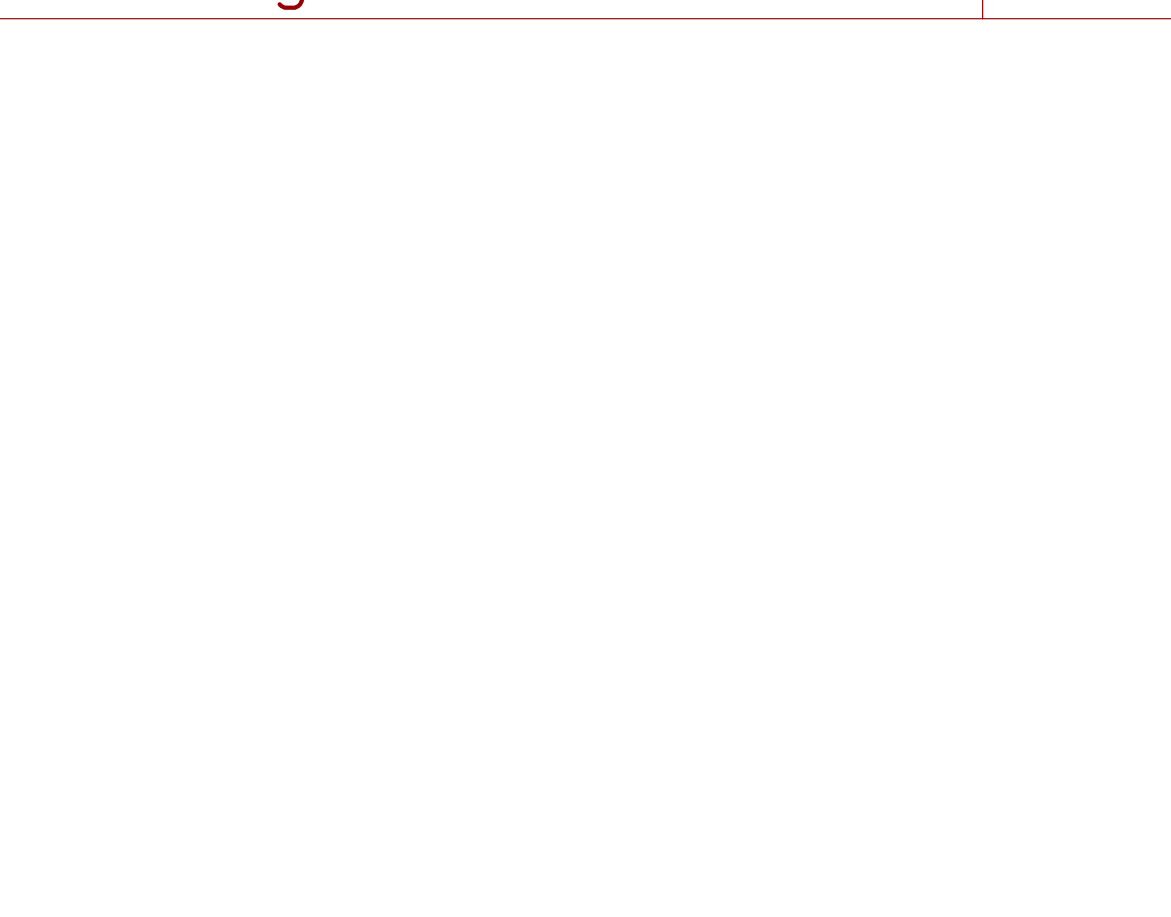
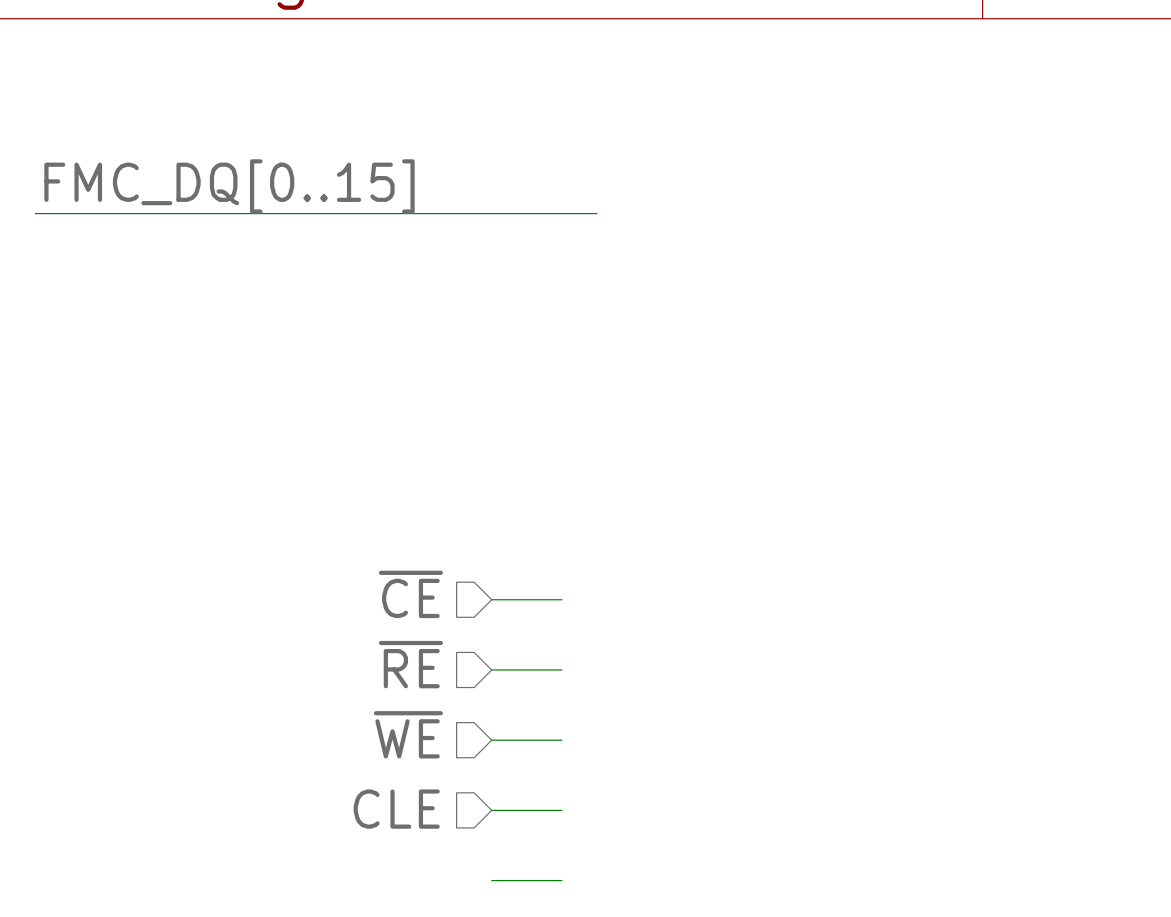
label: none -> FMC_DQ[0..15] (229, 186)
wire: none -> (35, 213) (597, 213)
hierarchical label: none -> ~{CE} (410, 594)
wire: none -> (491, 599) (561, 599)
hierarchical label: none -> ~{RE} (410, 664)
wire: none -> (491, 669) (561, 669)
hierarchical label: none -> ~{WE} (408, 734)
wire: none -> (491, 740) (561, 740)
hierarchical label: none -> CLE (396, 809)
wire: none -> (491, 810) (561, 810)
wire: none -> (491, 880) (561, 880)

